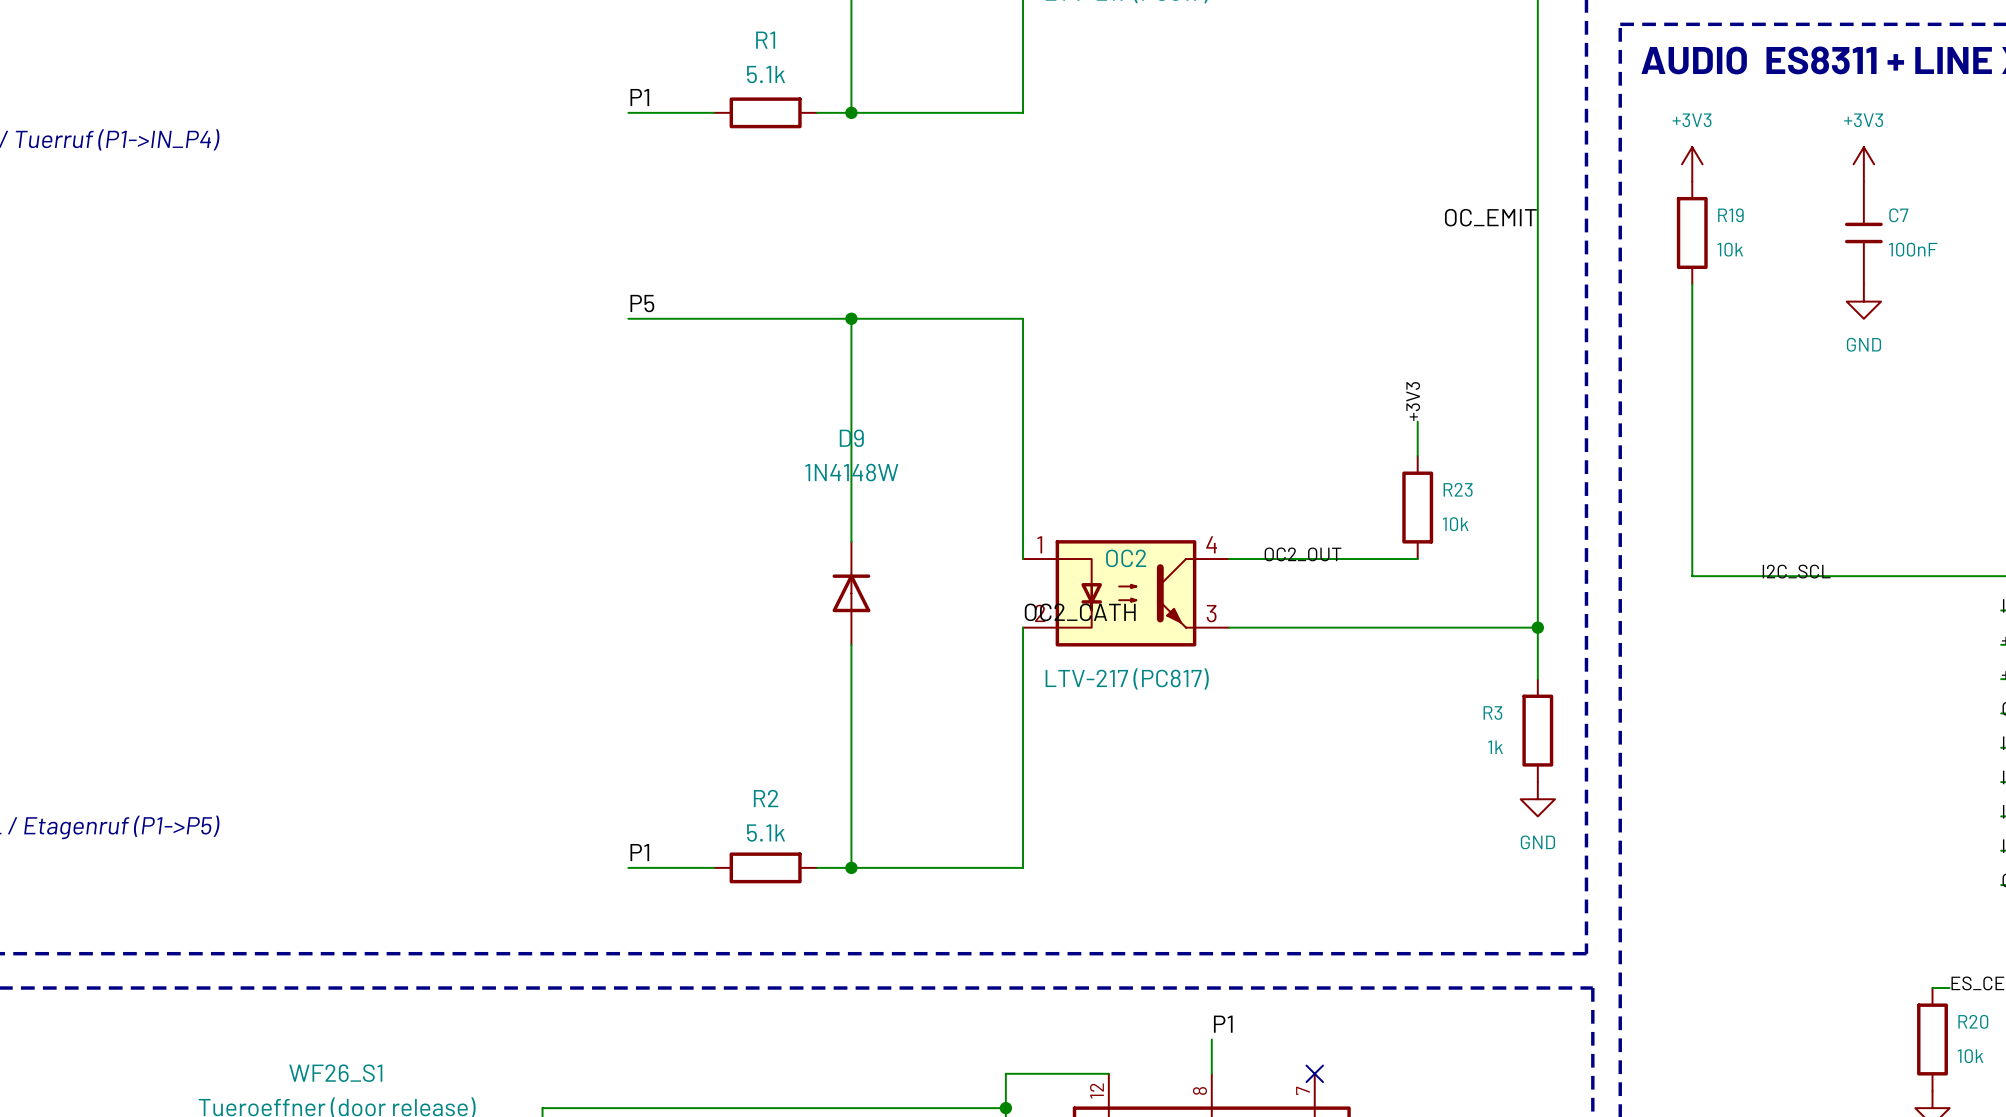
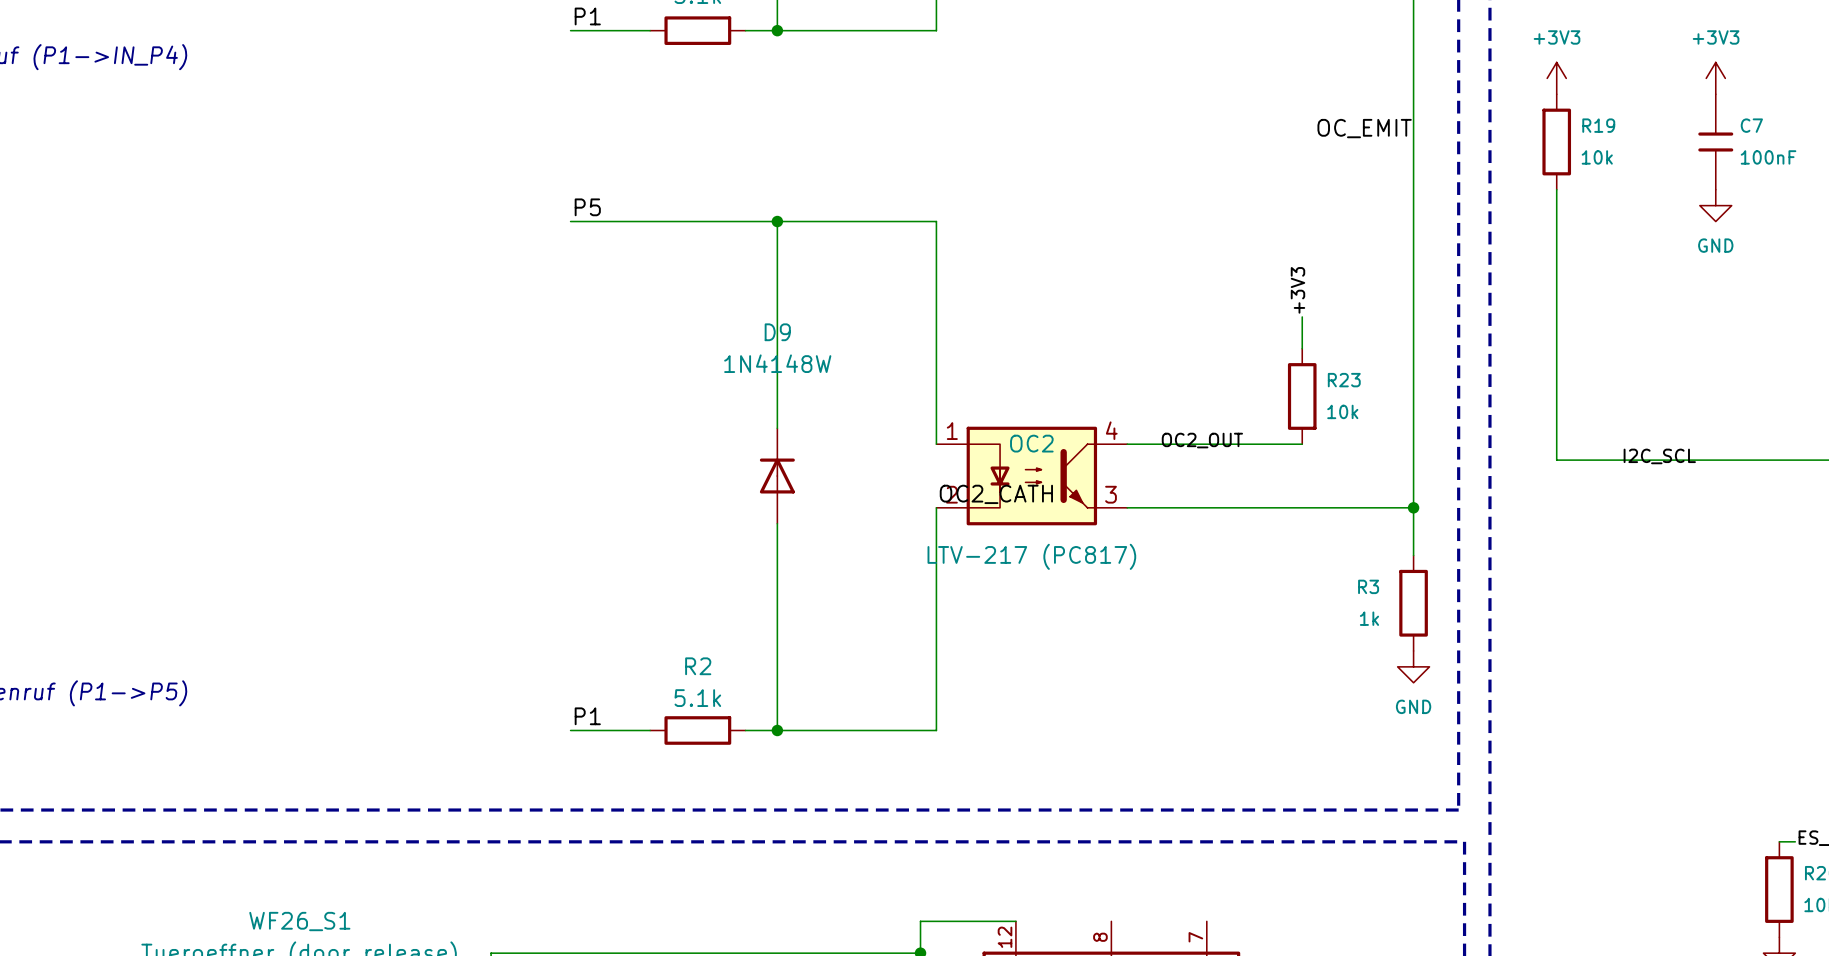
label: P1 (1223, 1024) -> none
wire: (1211, 1039) (1211, 1073) -> none
no-connect mark: (1314, 1073) -> none

